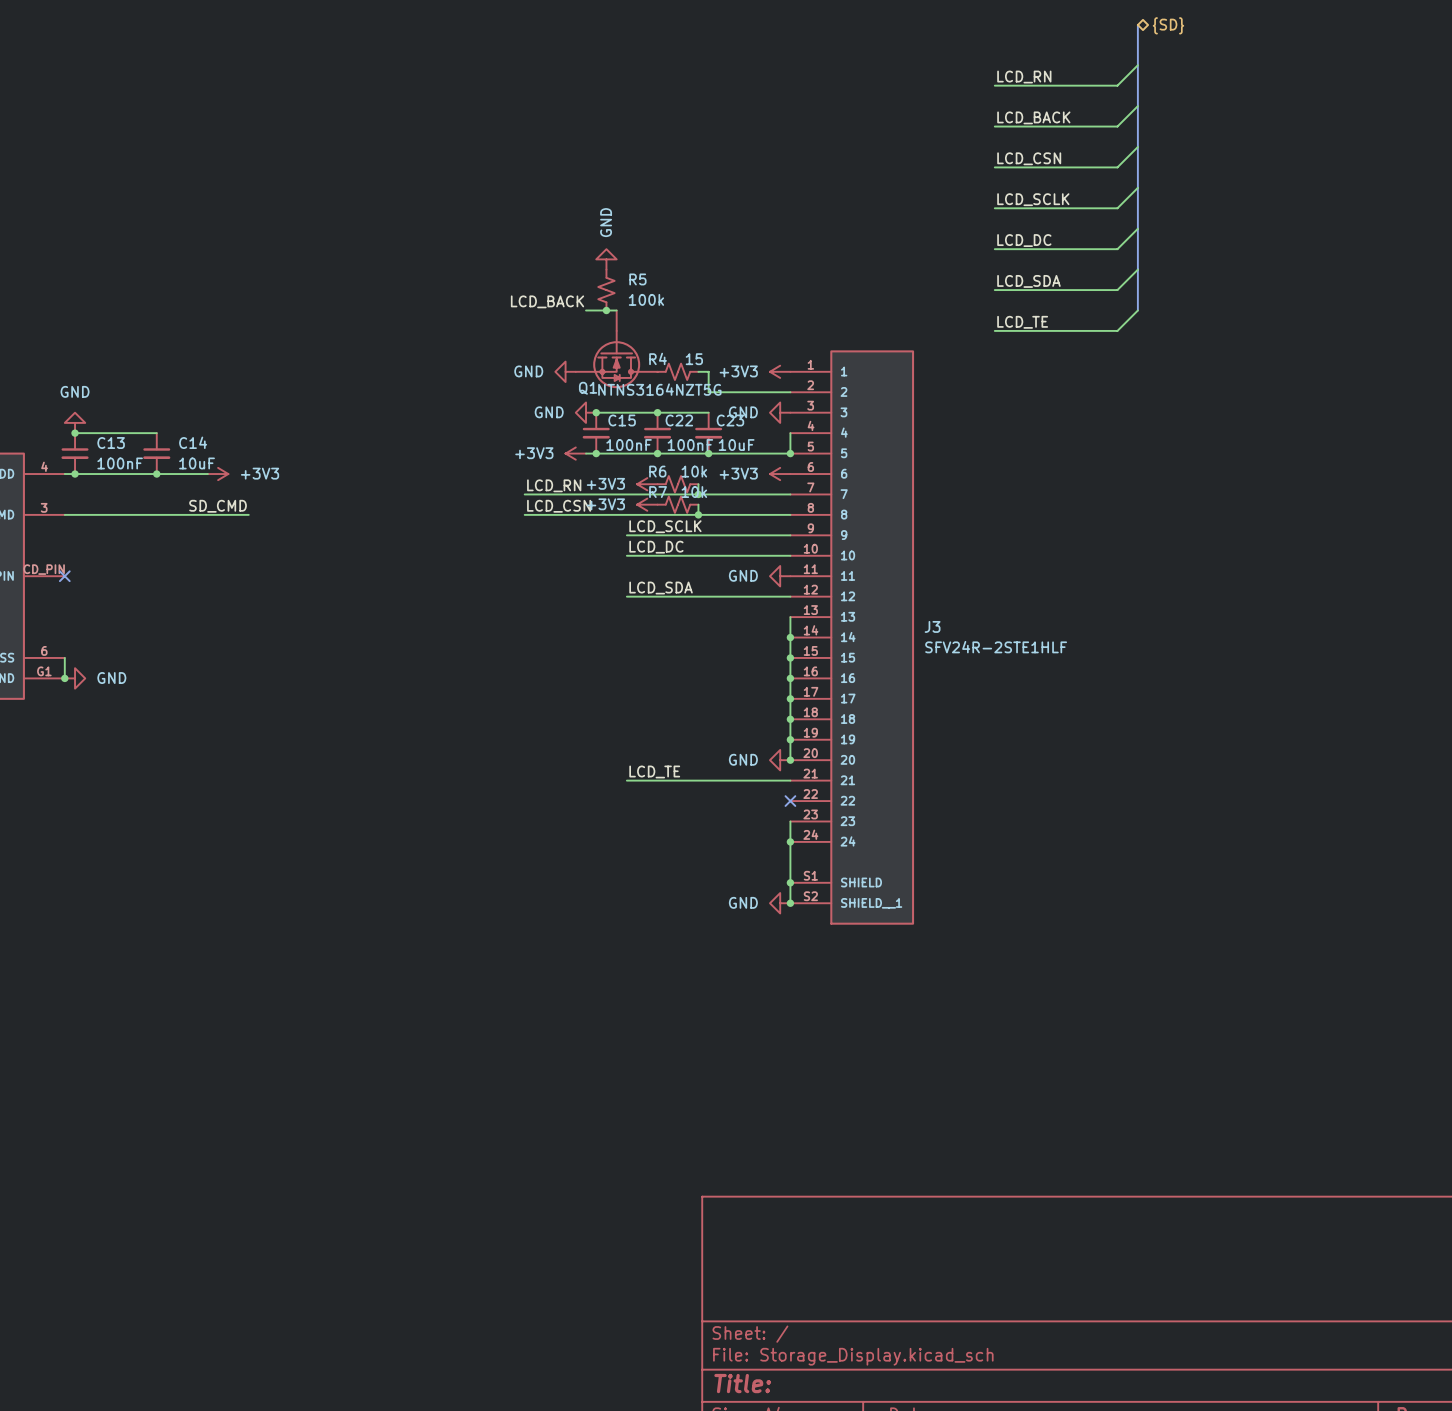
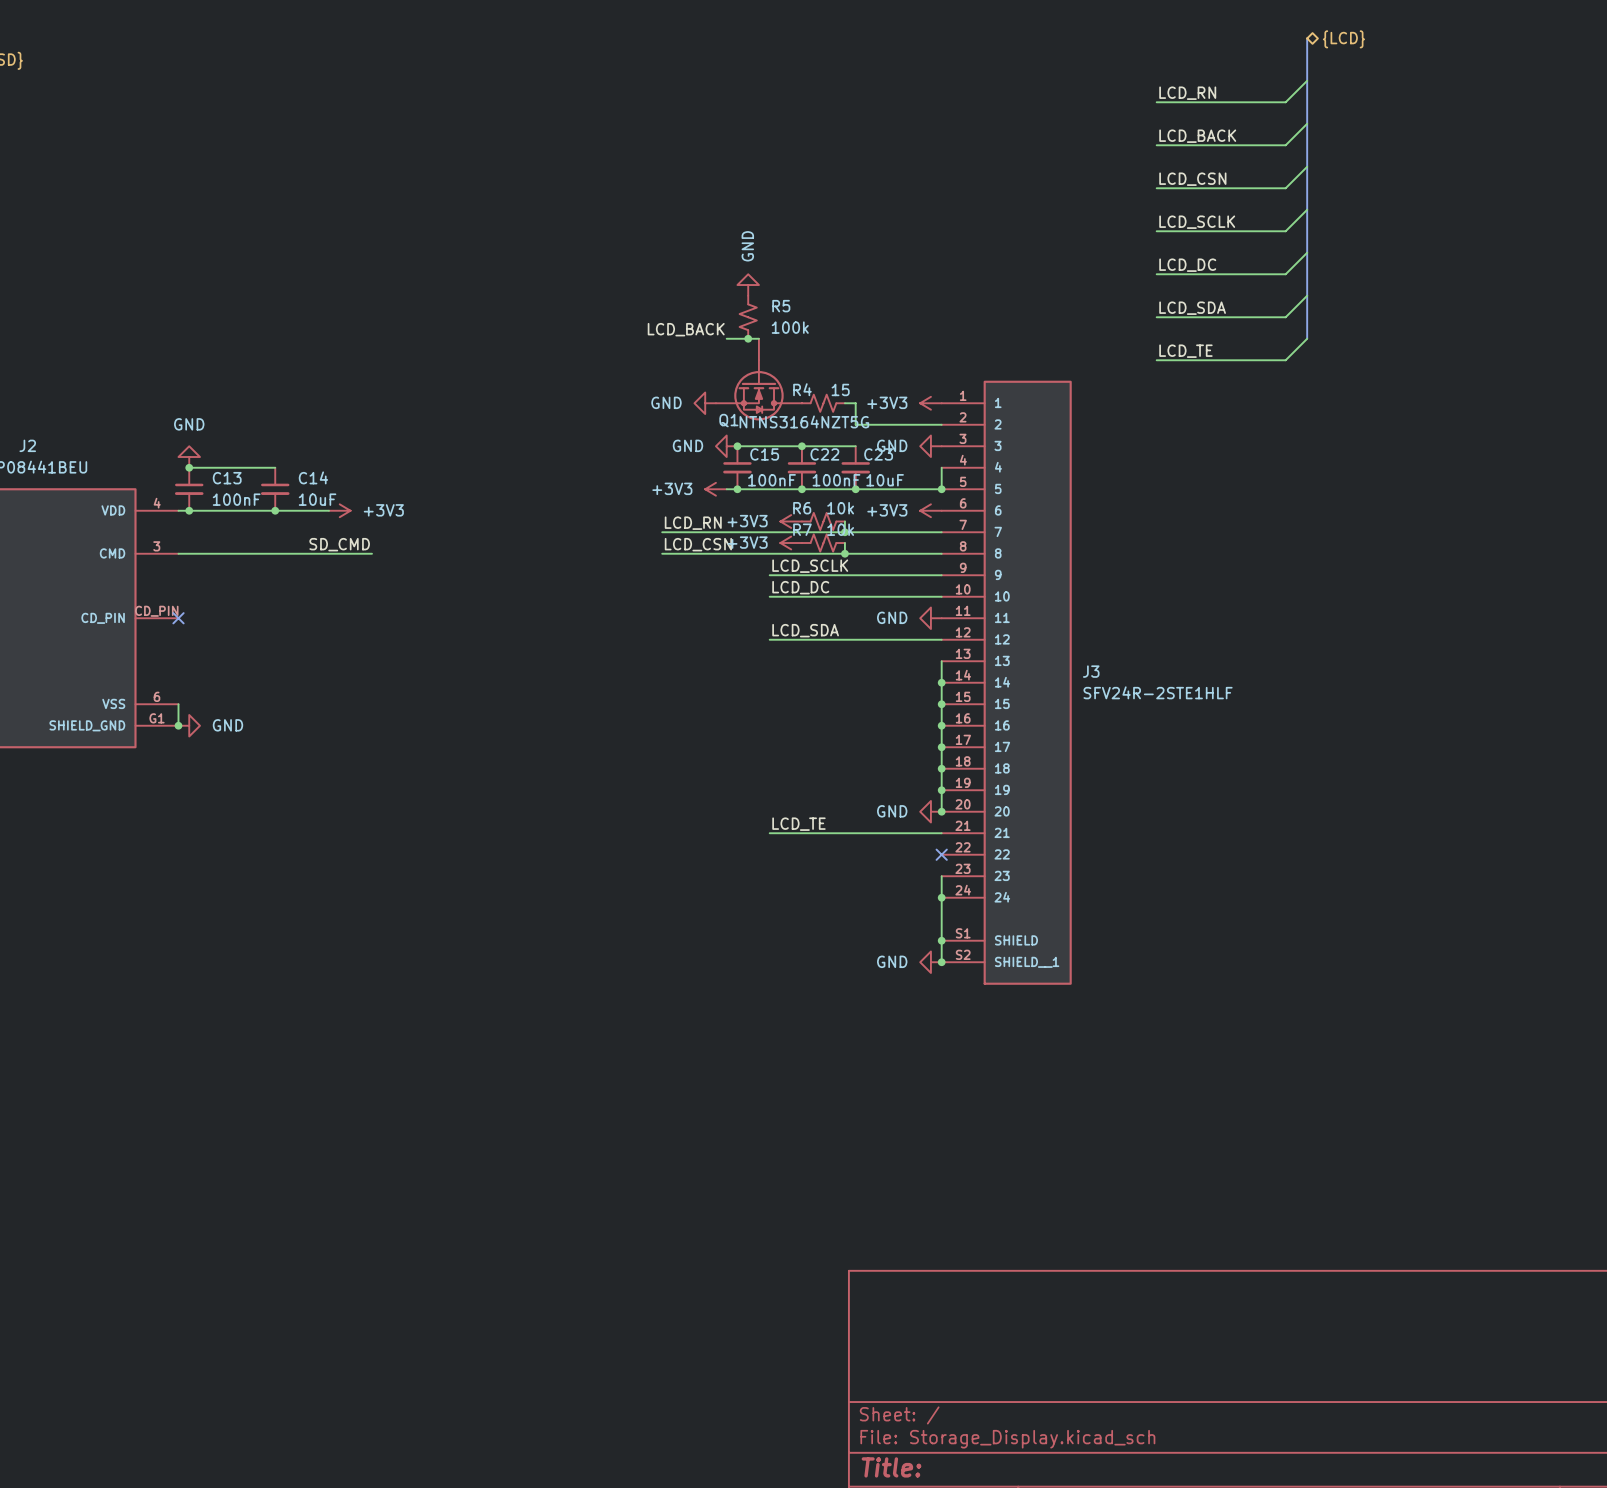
hierarchical label: {SD} (1168, 25) -> {LCD} (1343, 39)

